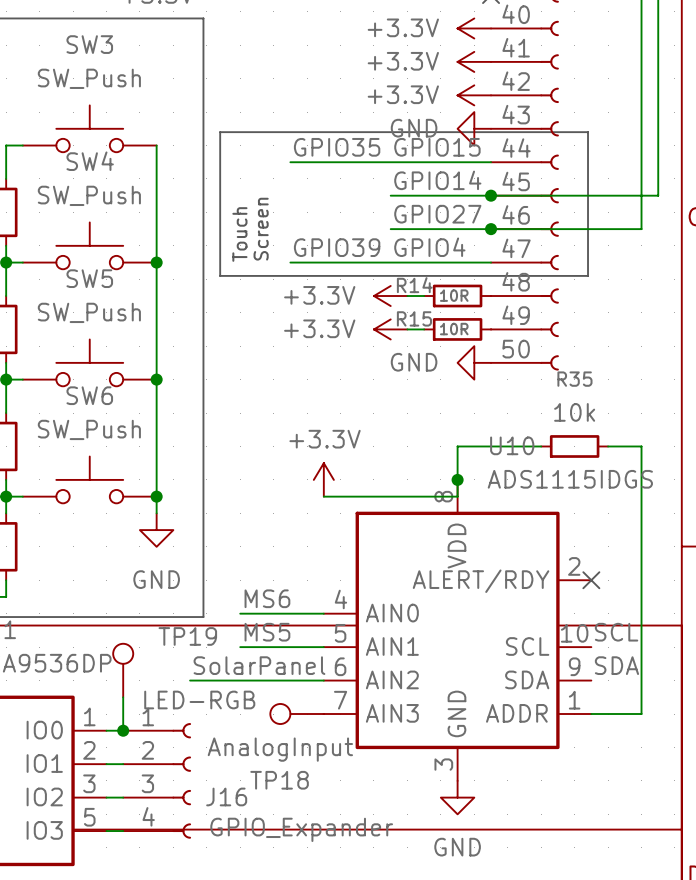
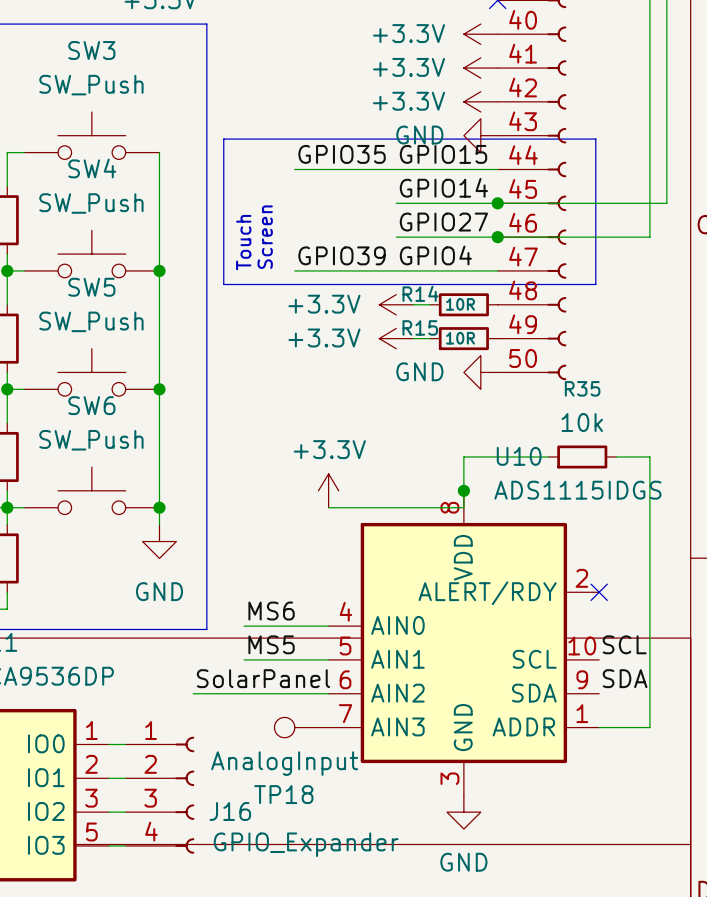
TP19: LED-RGB (123, 670) -> none
wire: (123, 697) (123, 730) -> none
junction: (123, 730) -> none

